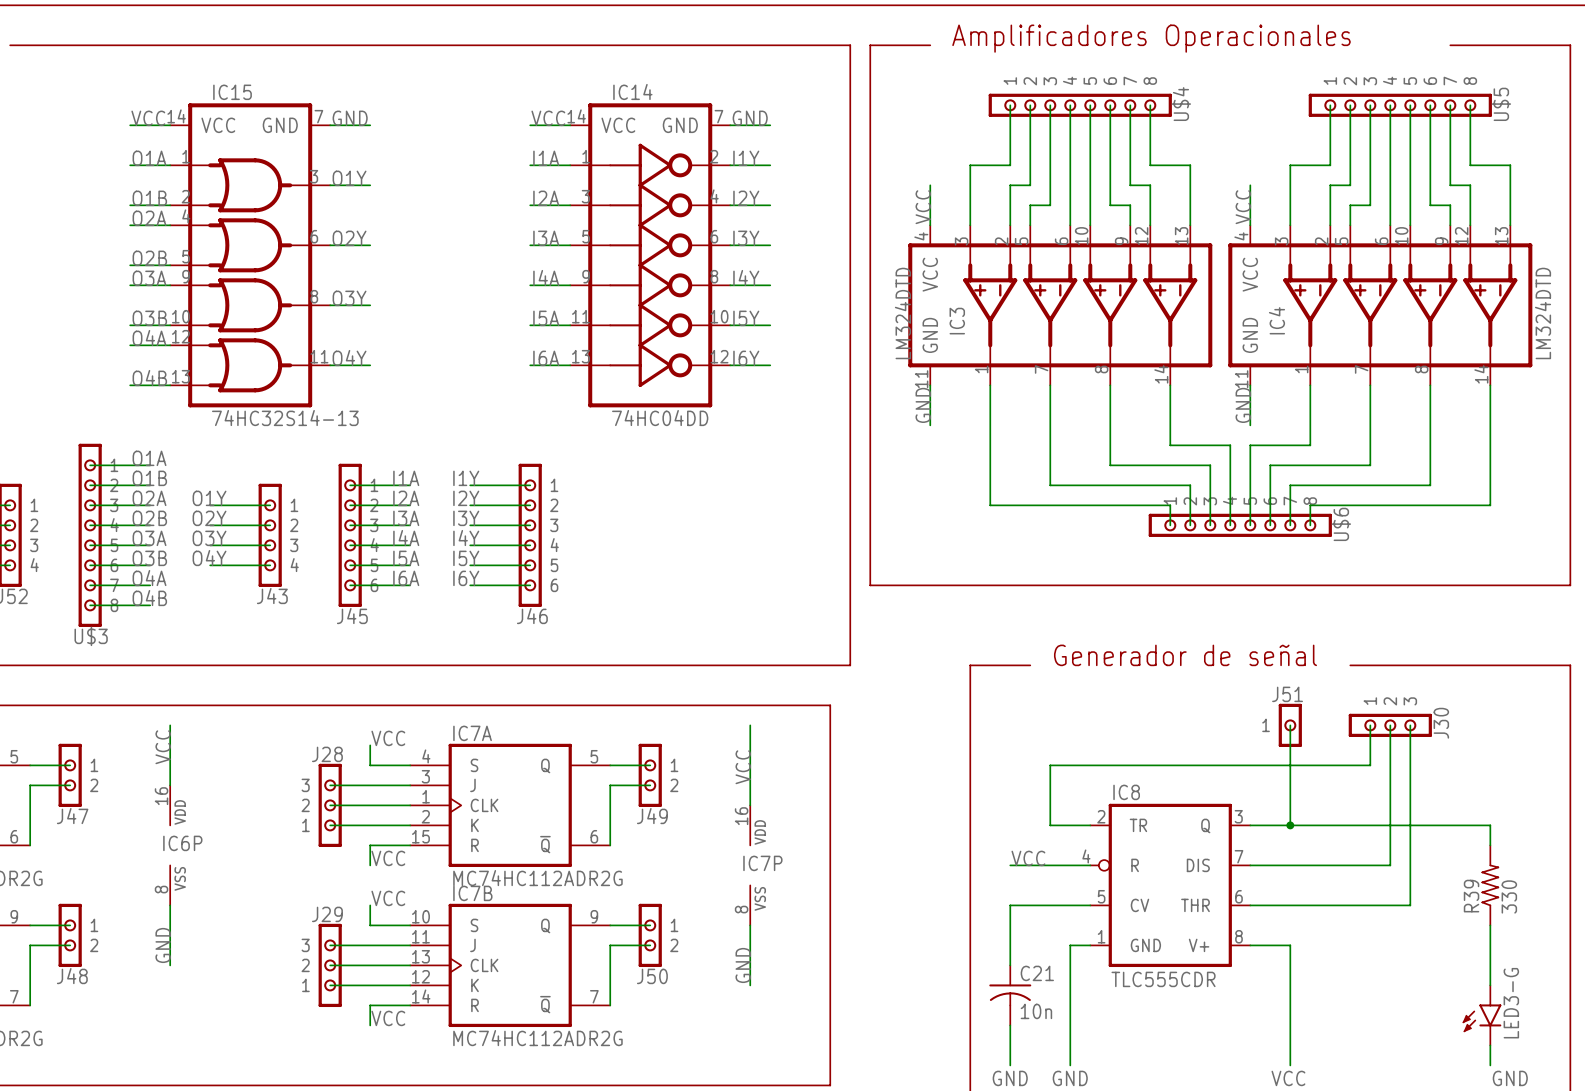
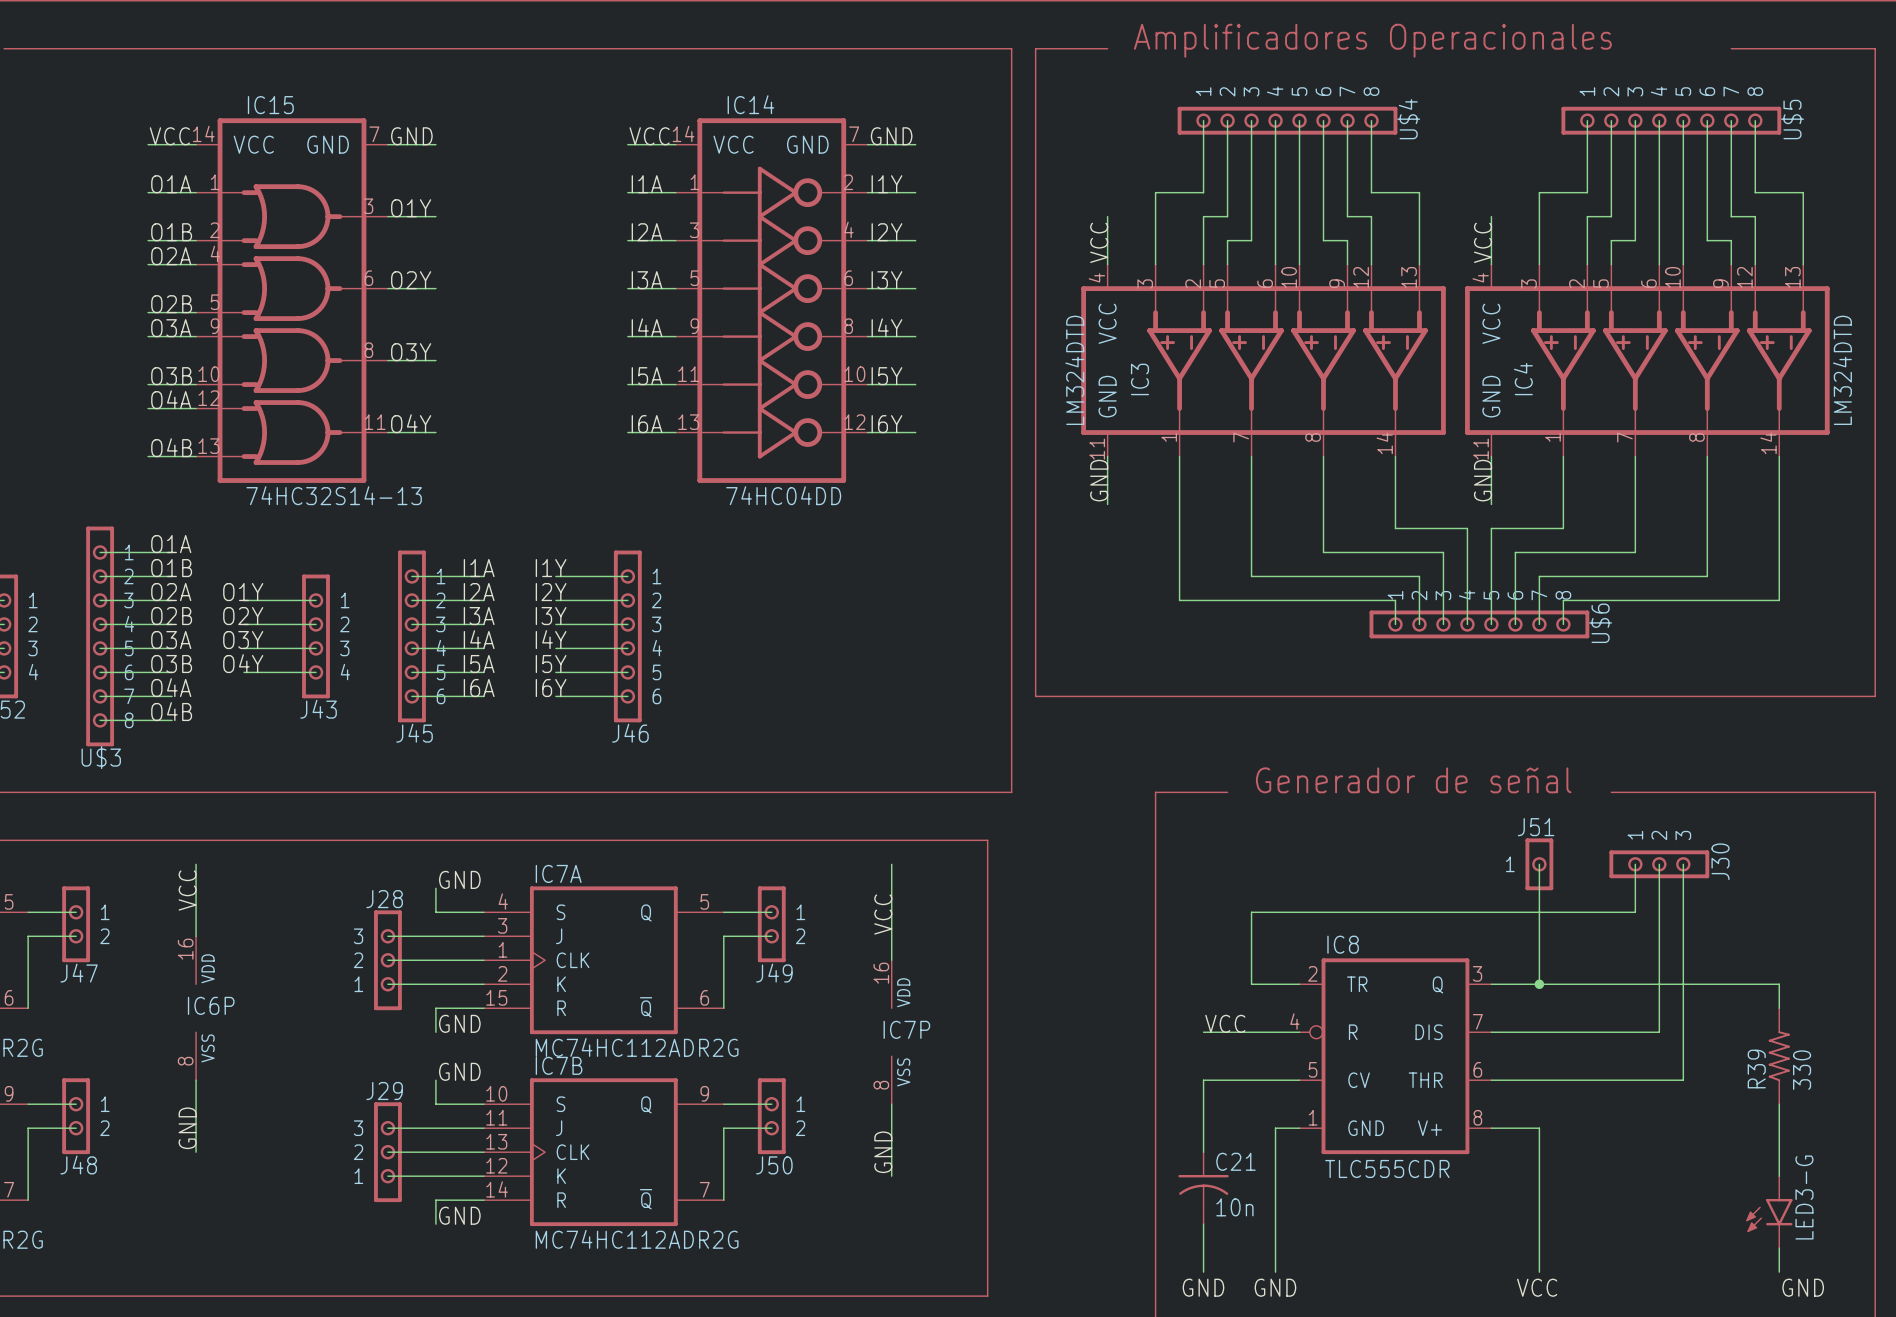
label: VCC (388, 738) -> GND (459, 879)
label: VCC (388, 858) -> GND (459, 1023)
label: VCC (388, 898) -> GND (459, 1071)
label: VCC (388, 1018) -> GND (459, 1215)

